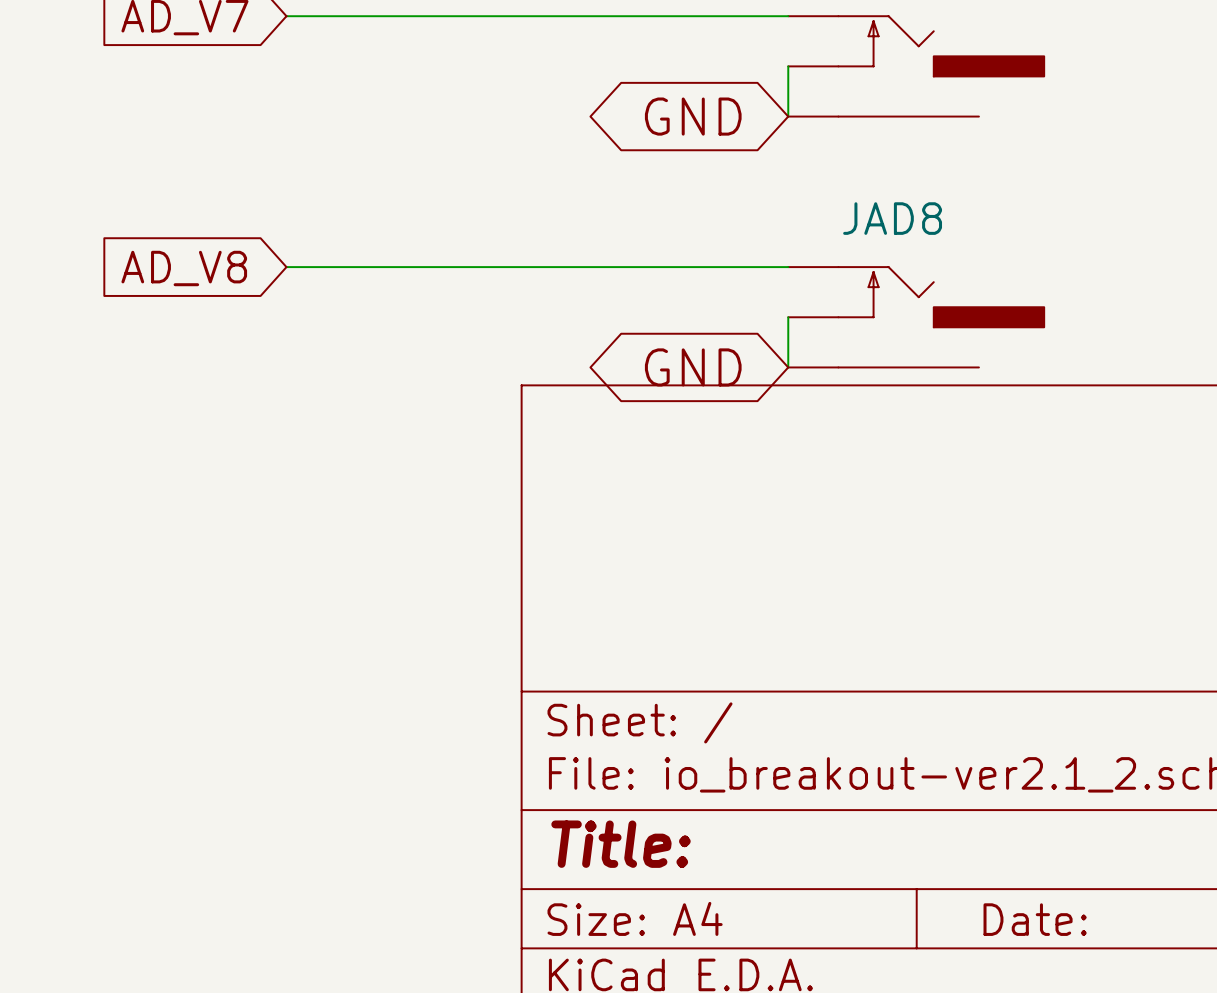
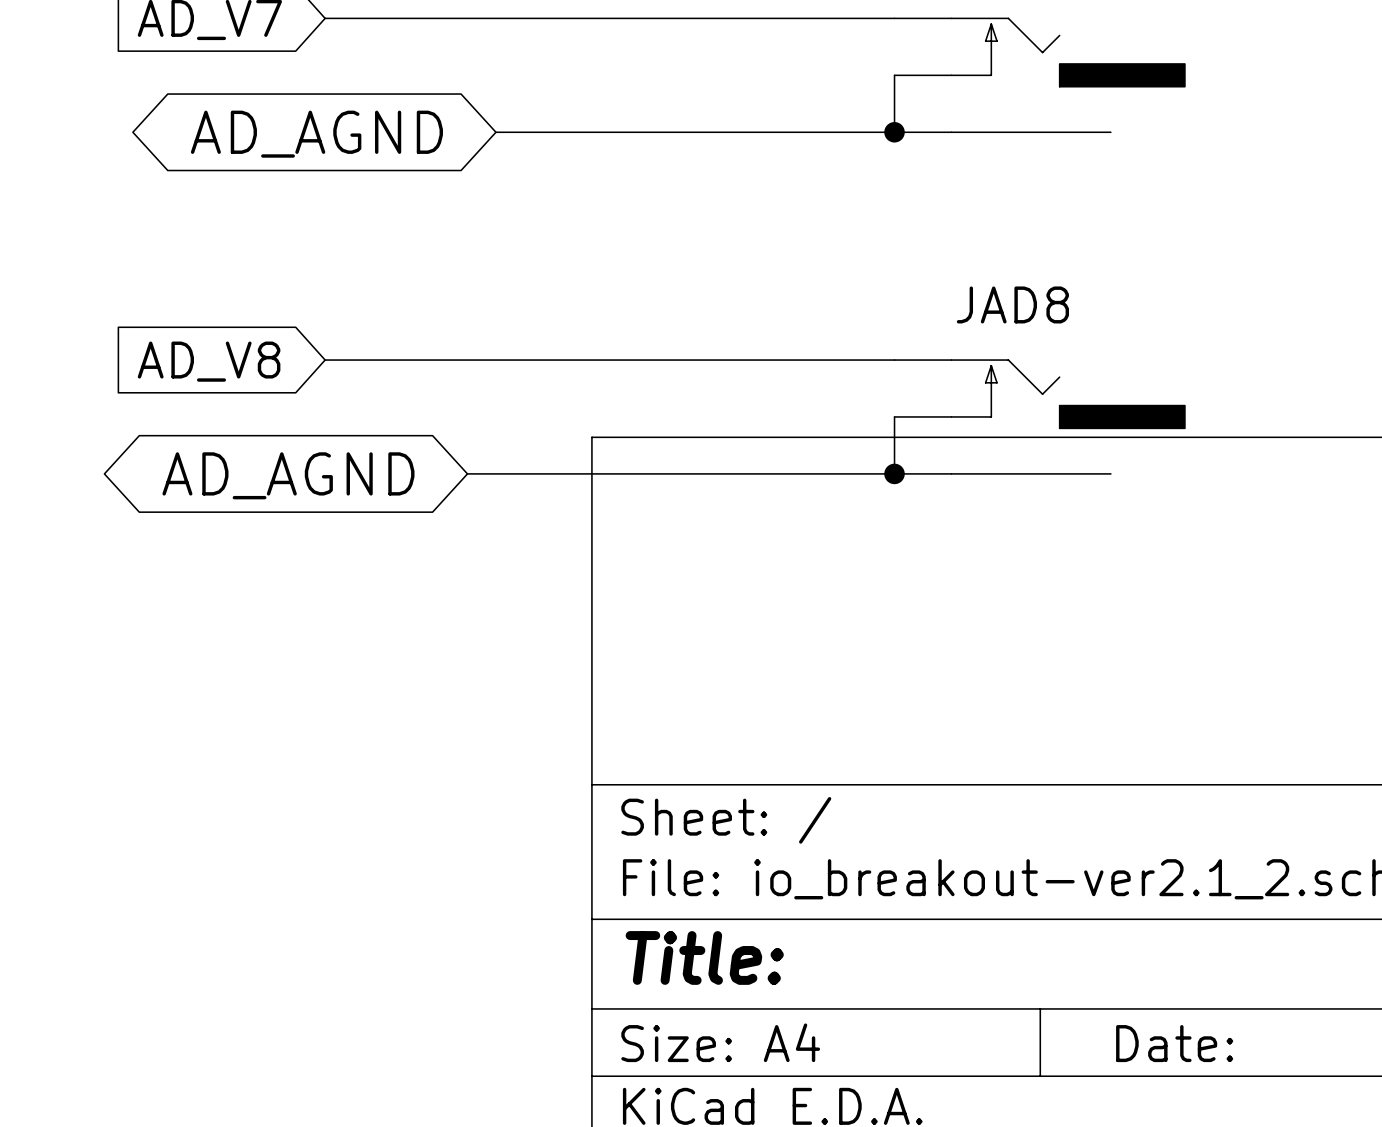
wire: none -> (495, 132) (894, 132)
global label: GND (693, 116) -> none
junction: none -> (894, 132)
global label: none -> AD_AGND (316, 134)
wire: (286, 267) (788, 267) -> (325, 360) (894, 360)
global label position: AD_V8 (184, 268) -> AD_V8 (209, 361)
wire: (788, 317) (788, 367) -> (467, 473) (894, 473) (894, 416)
JAD8 position: (916, 317) -> (1039, 416)
global label: GND (693, 367) -> none
junction: none -> (894, 473)
global label: none -> AD_AGND (288, 475)

